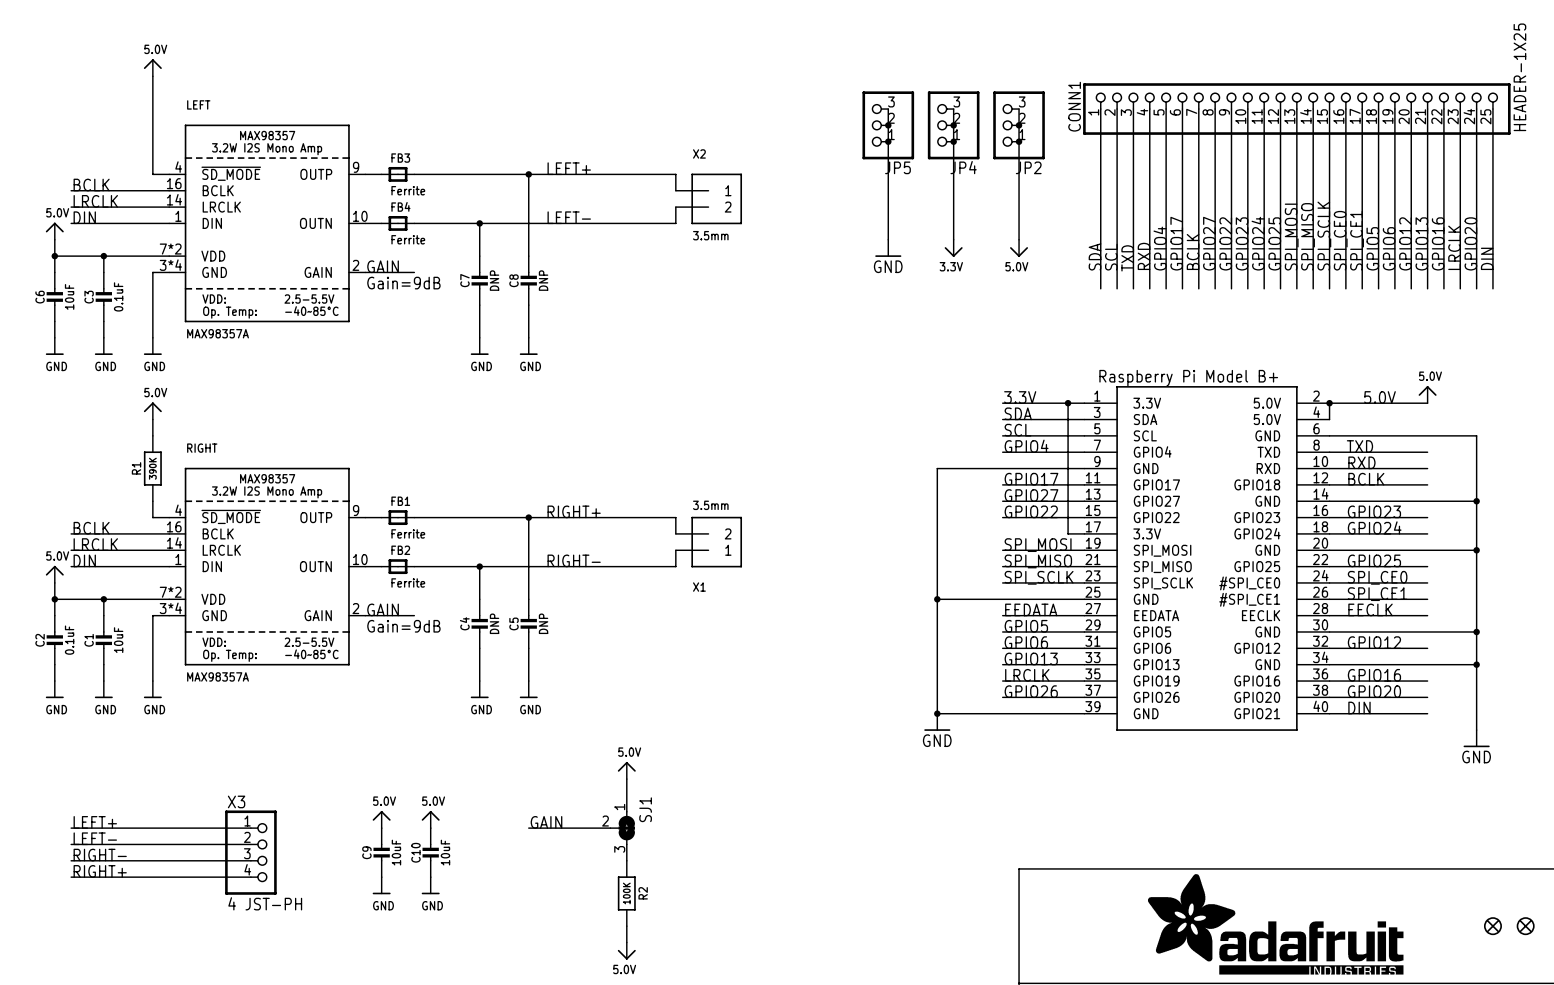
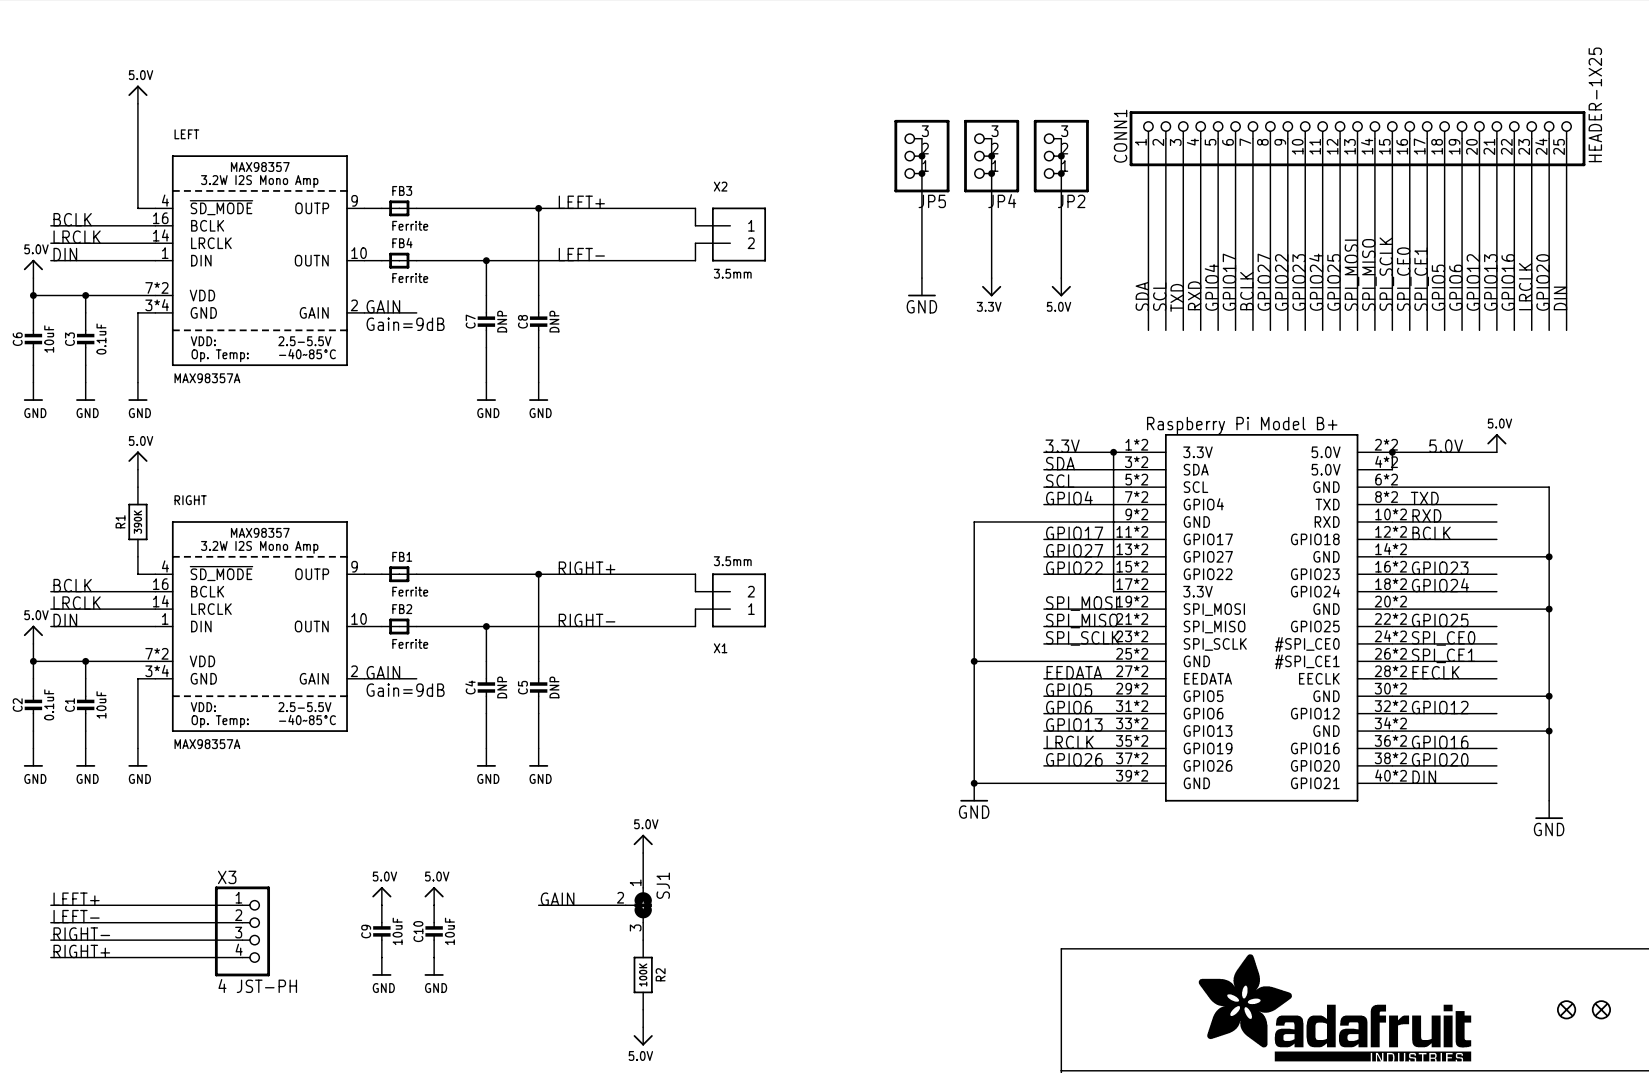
part symbol: [1084, 386, 1330, 731] -> [1131, 434, 1393, 802]

